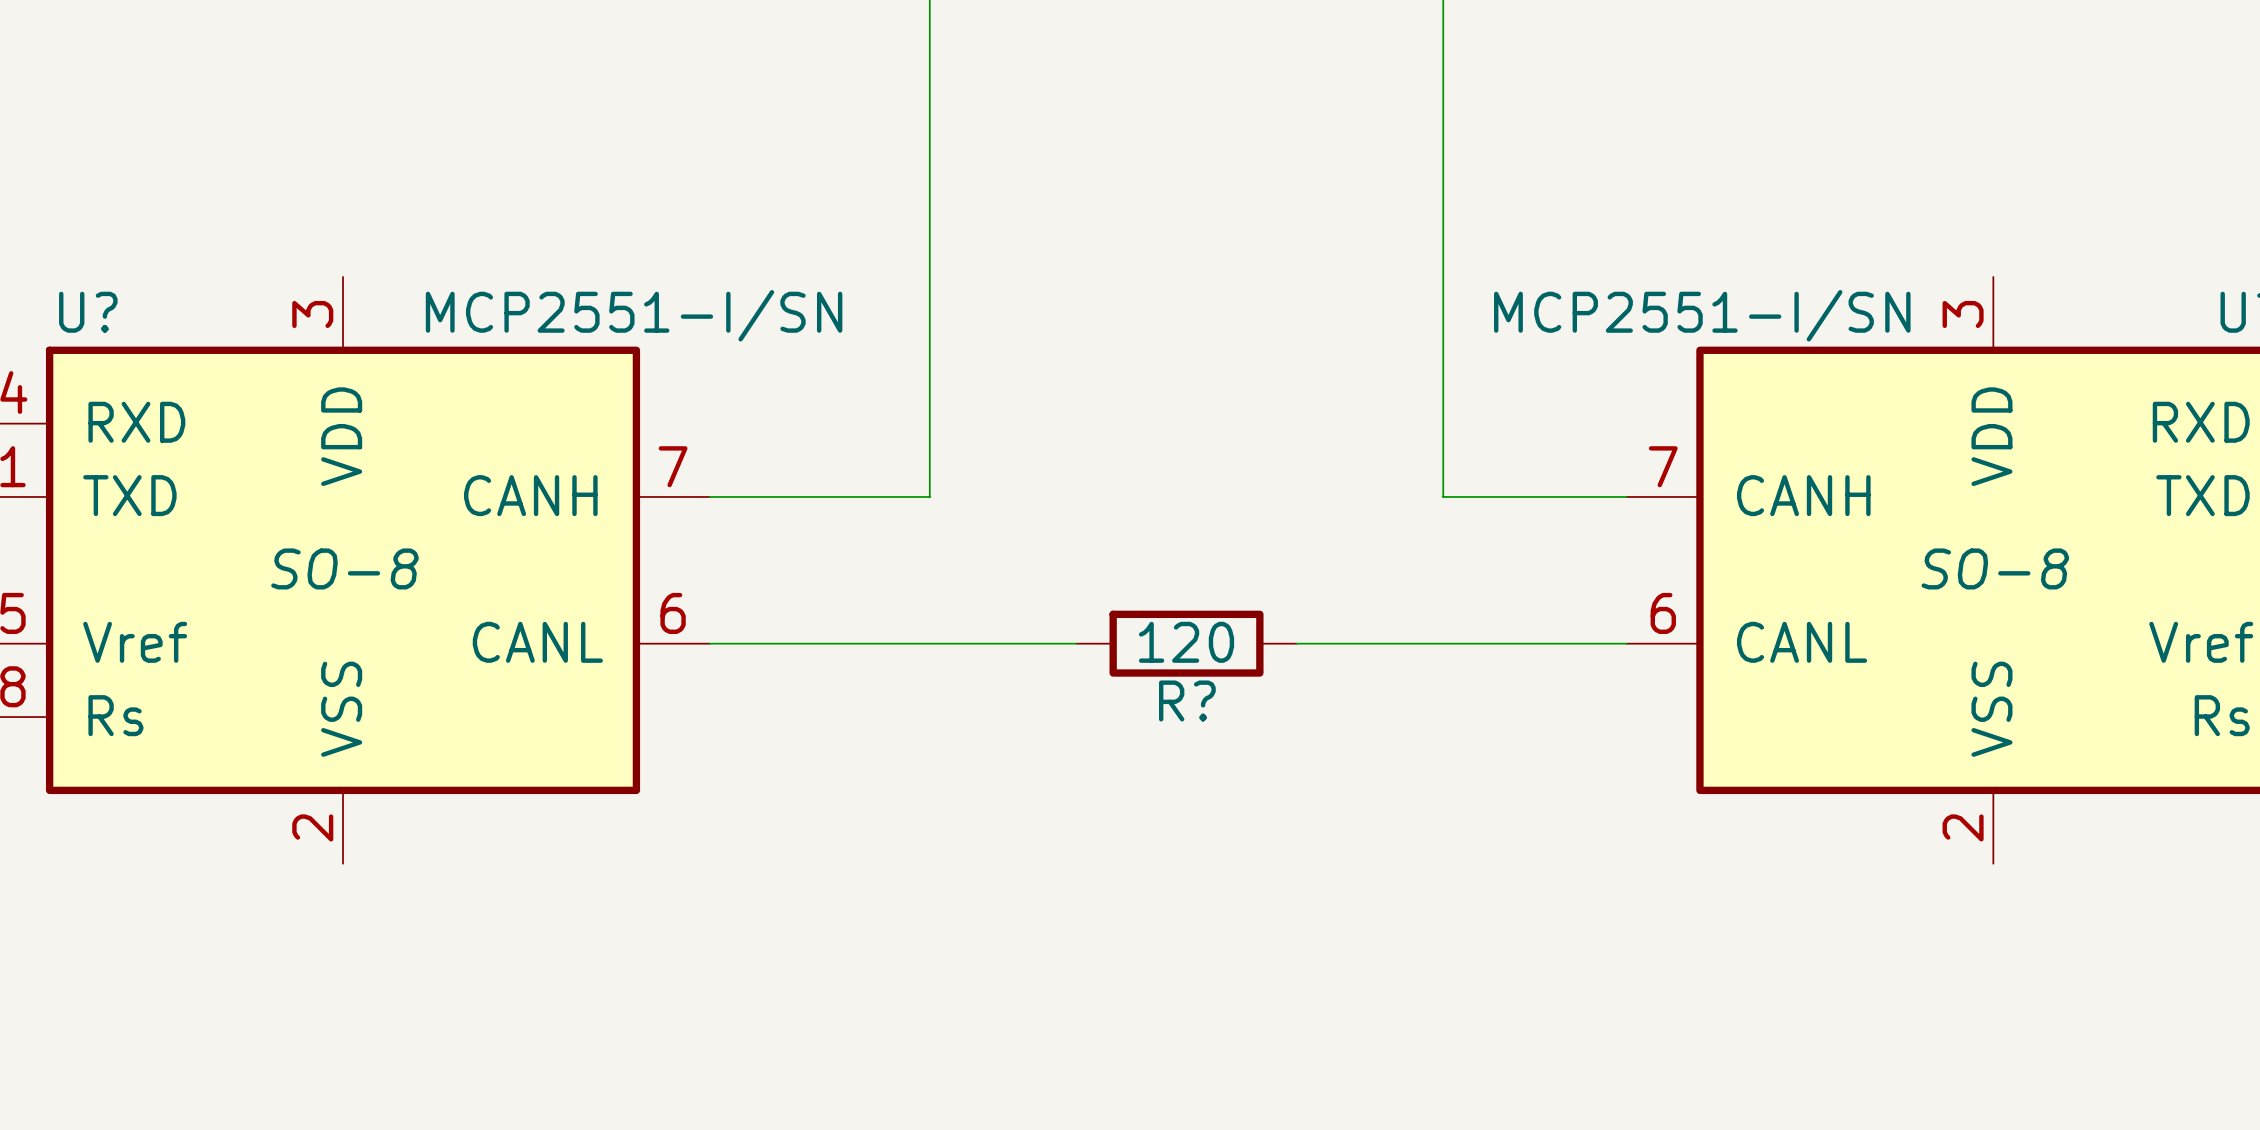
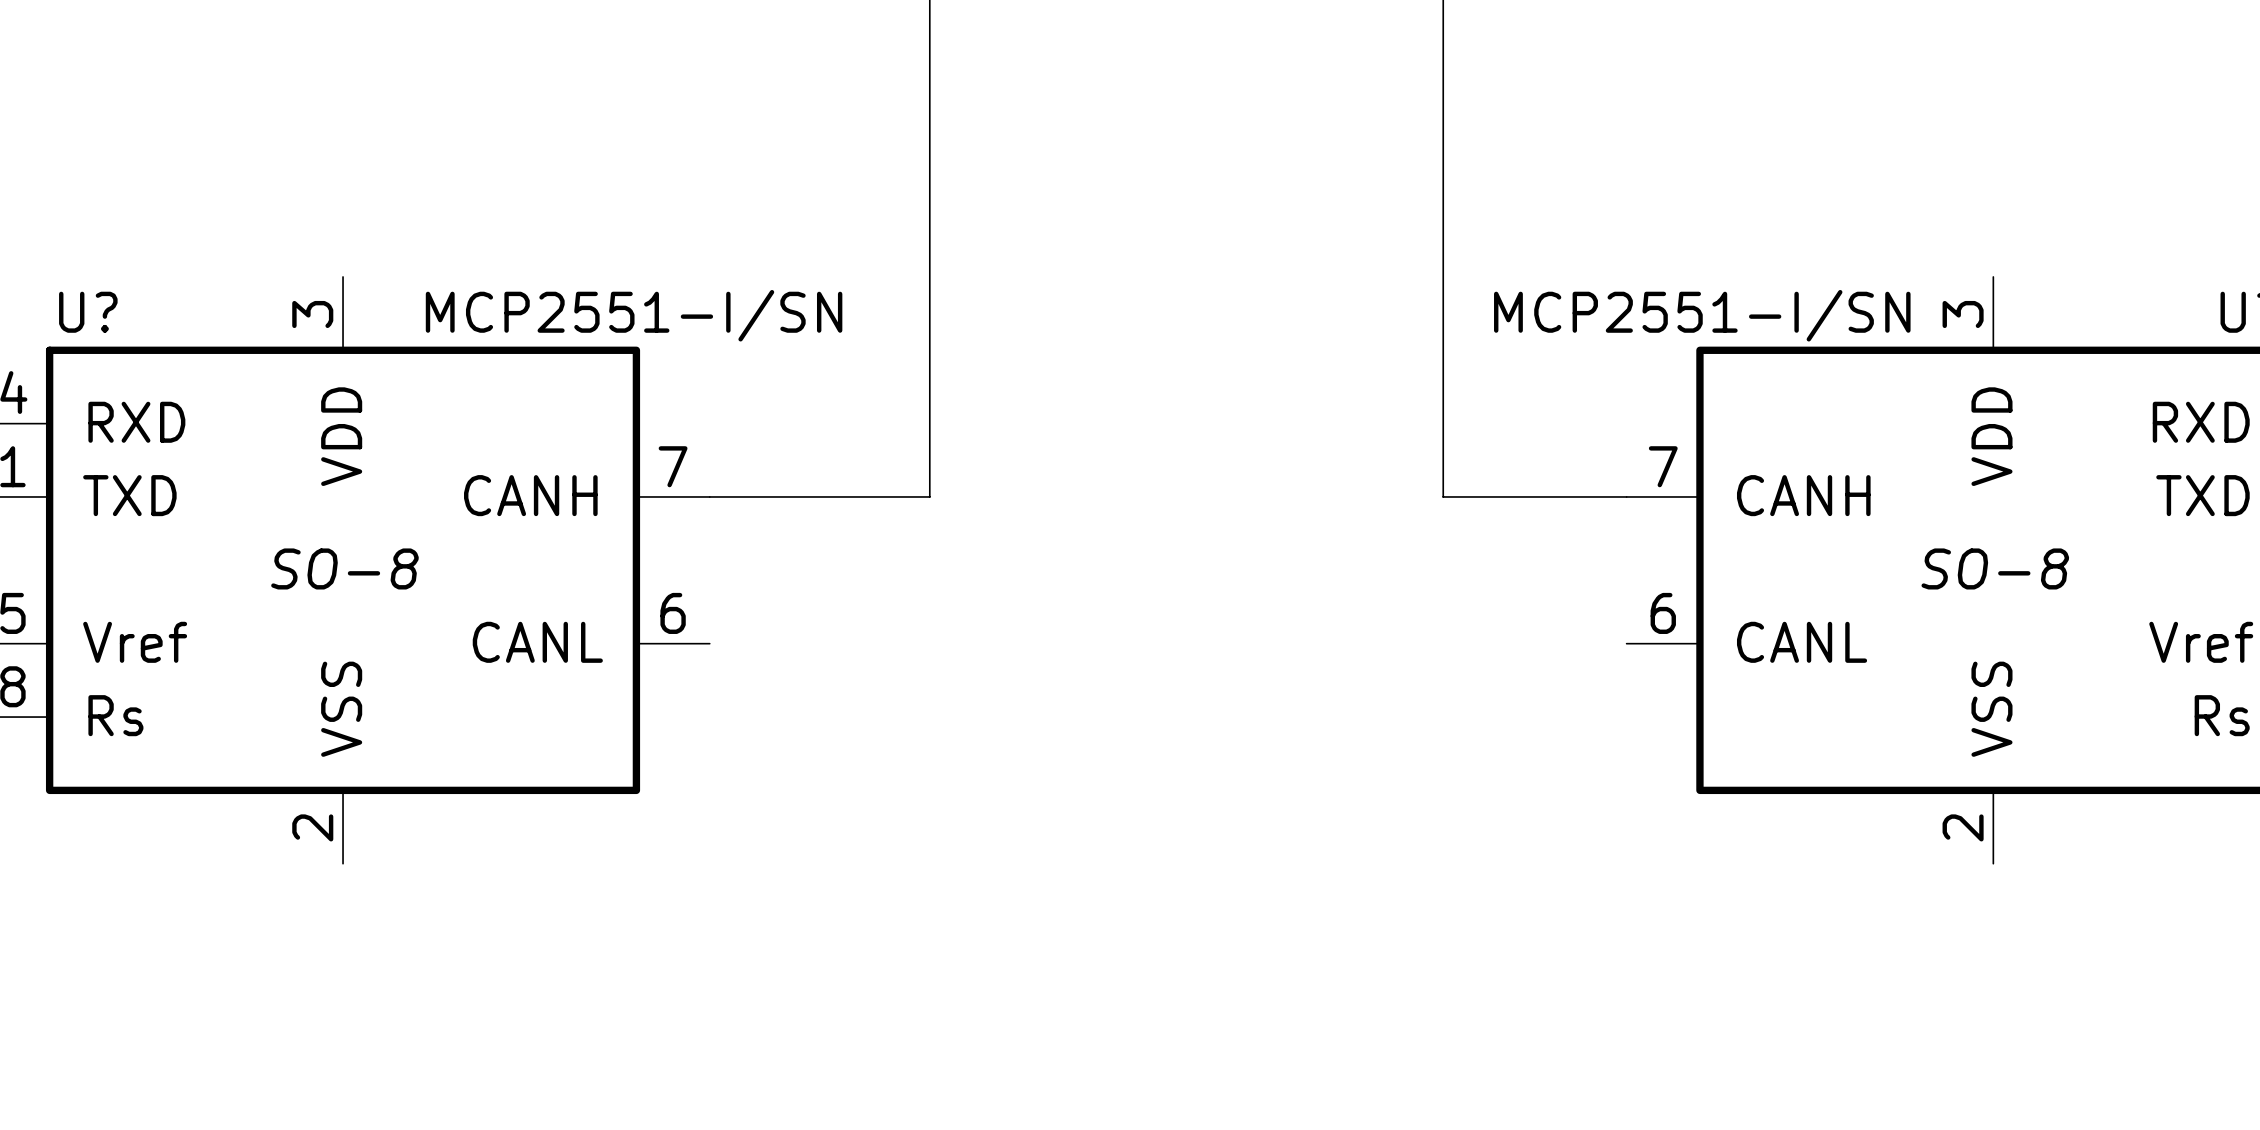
wire: (709, 643) (1076, 643) -> none
R?: 120 (1186, 643) -> none
wire: (1296, 643) (1626, 643) -> none

